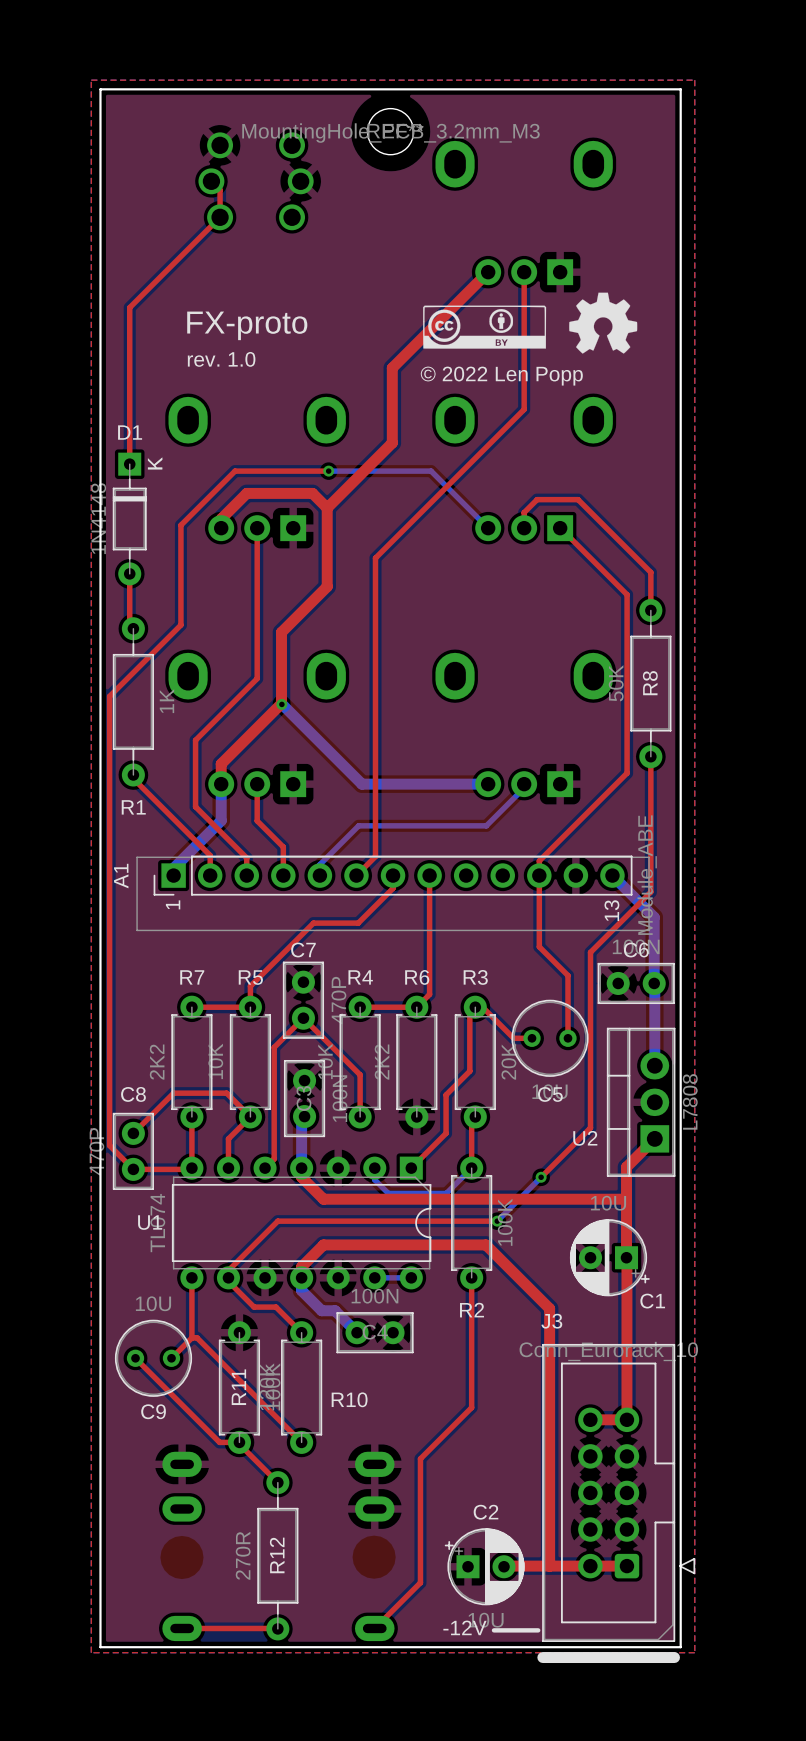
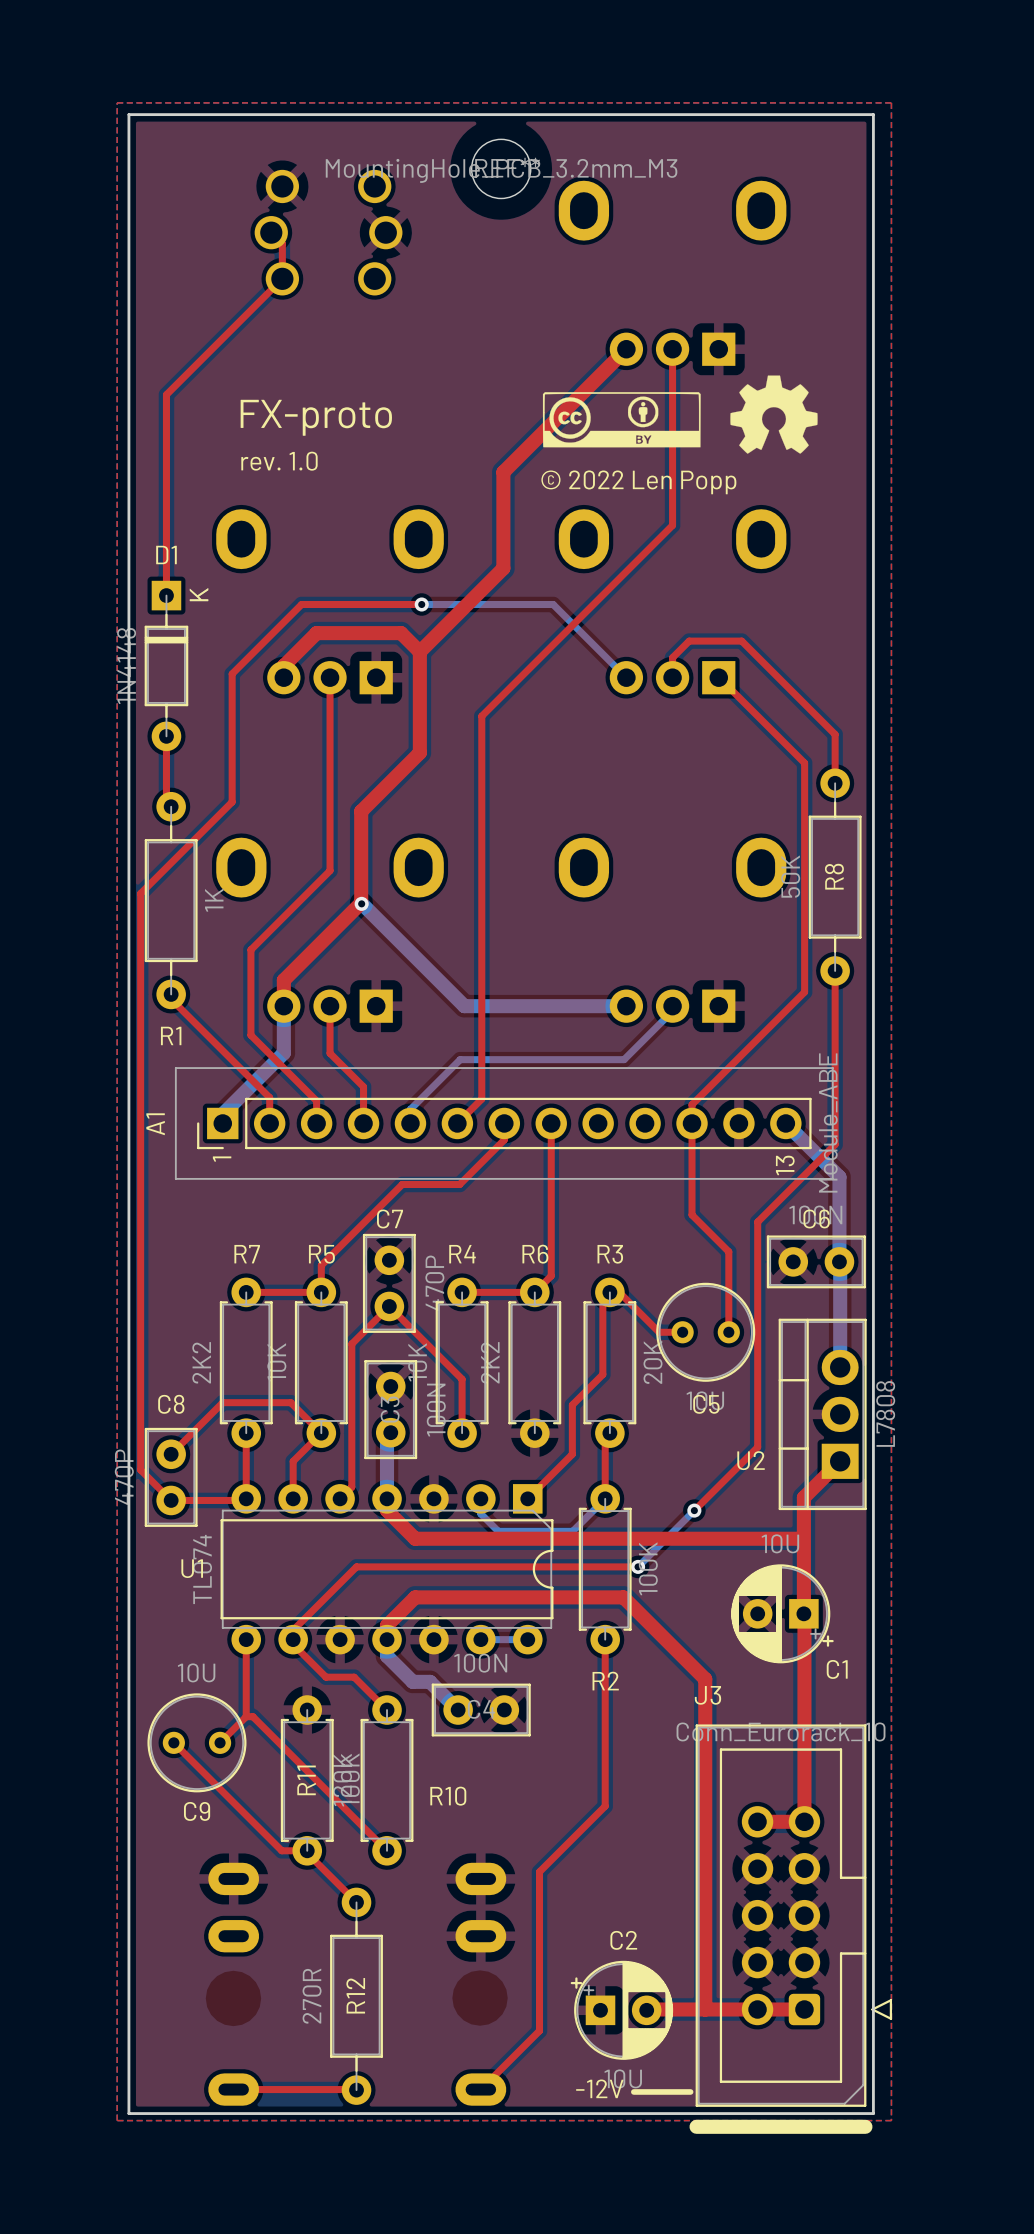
A1 footprint: [136, 855, 650, 932] -> [174, 1067, 834, 1180]

